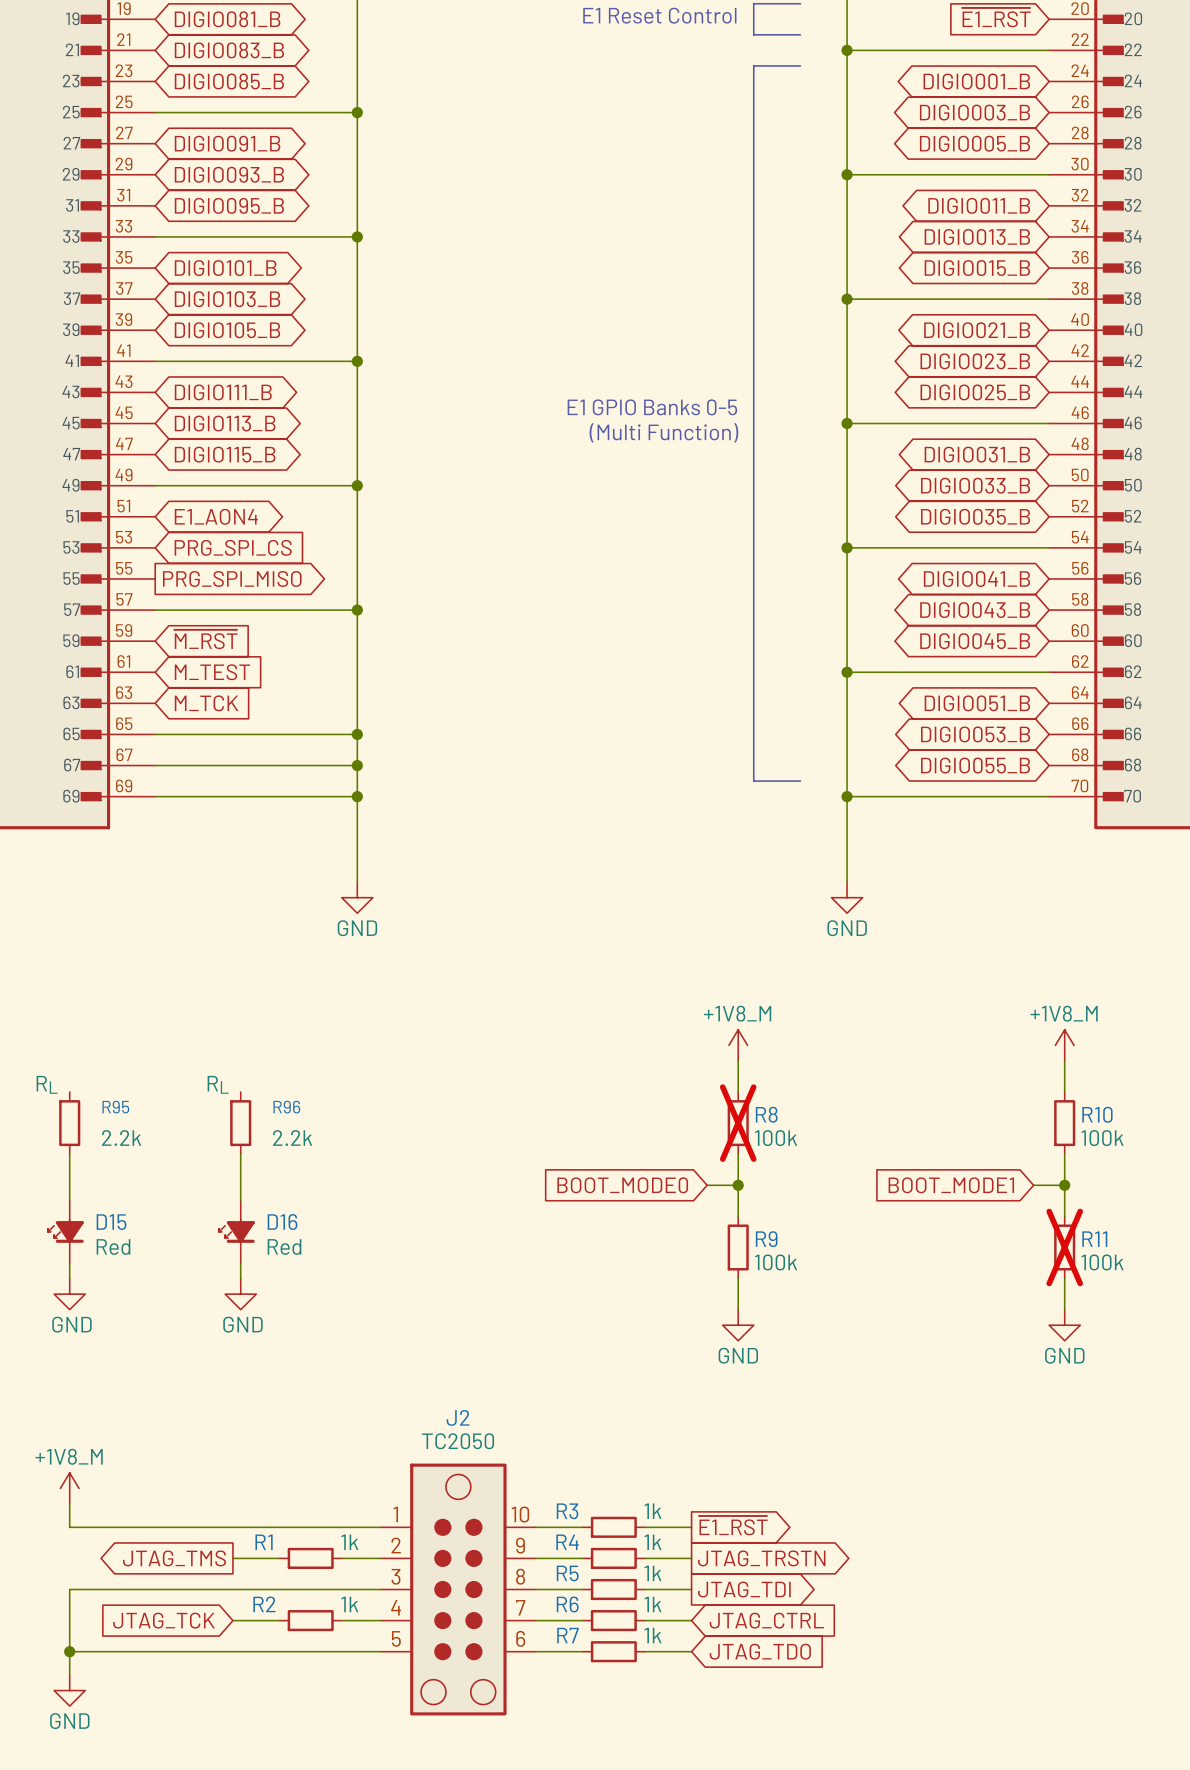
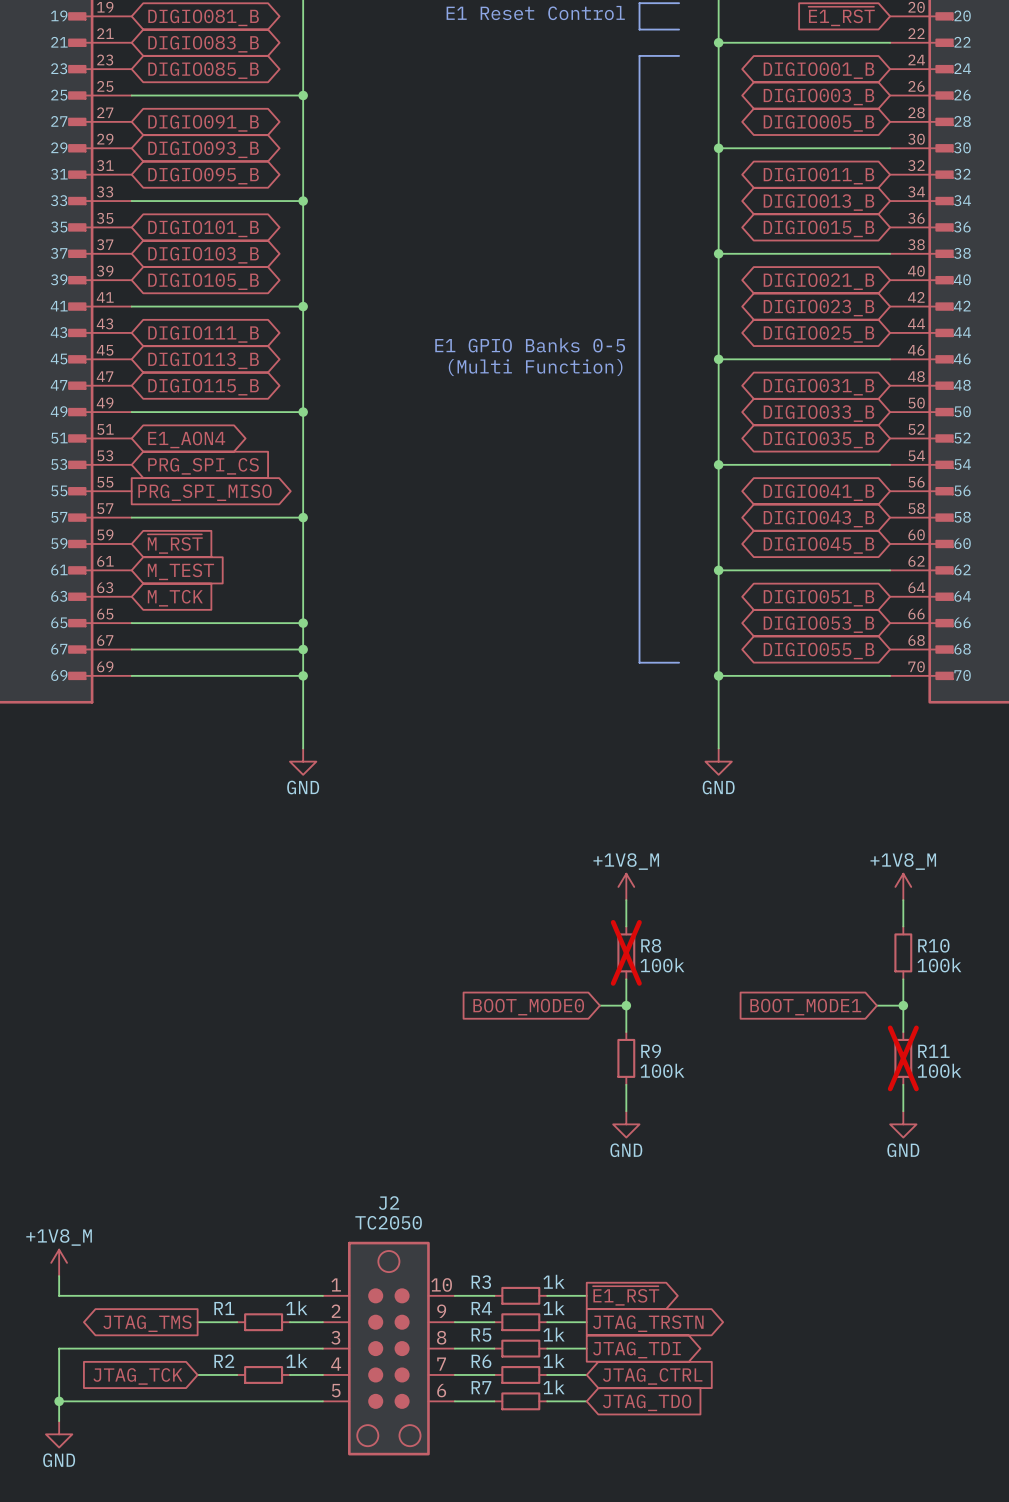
R95: 2.2k (69, 1123) -> none
R96: 2.2k (240, 1123) -> none
wire: (69, 1154) (69, 1200) -> none
wire: (240, 1154) (240, 1200) -> none
D15: (65, 1231) -> none
D16: (236, 1231) -> none
wire: (69, 1263) (69, 1278) -> none
wire: (240, 1263) (240, 1278) -> none
power symbol: GND (69, 1294) -> none
power symbol: GND (240, 1294) -> none

